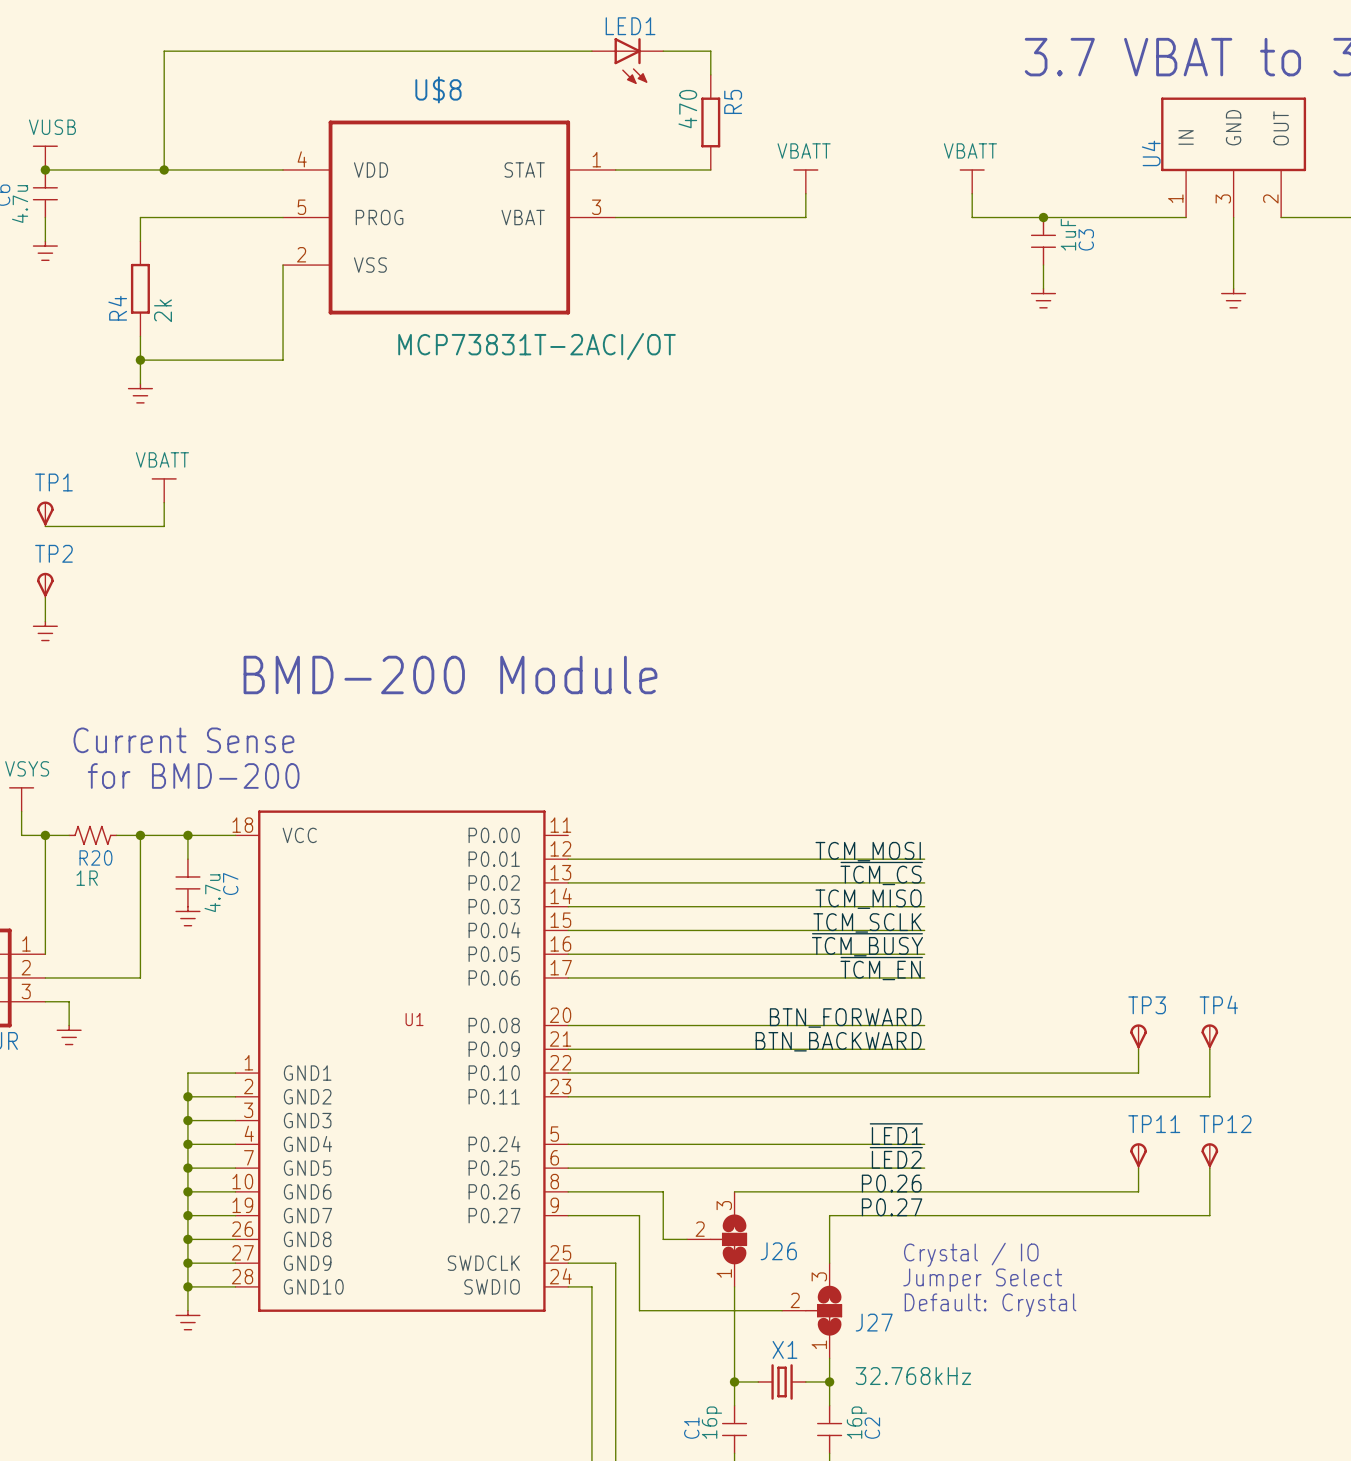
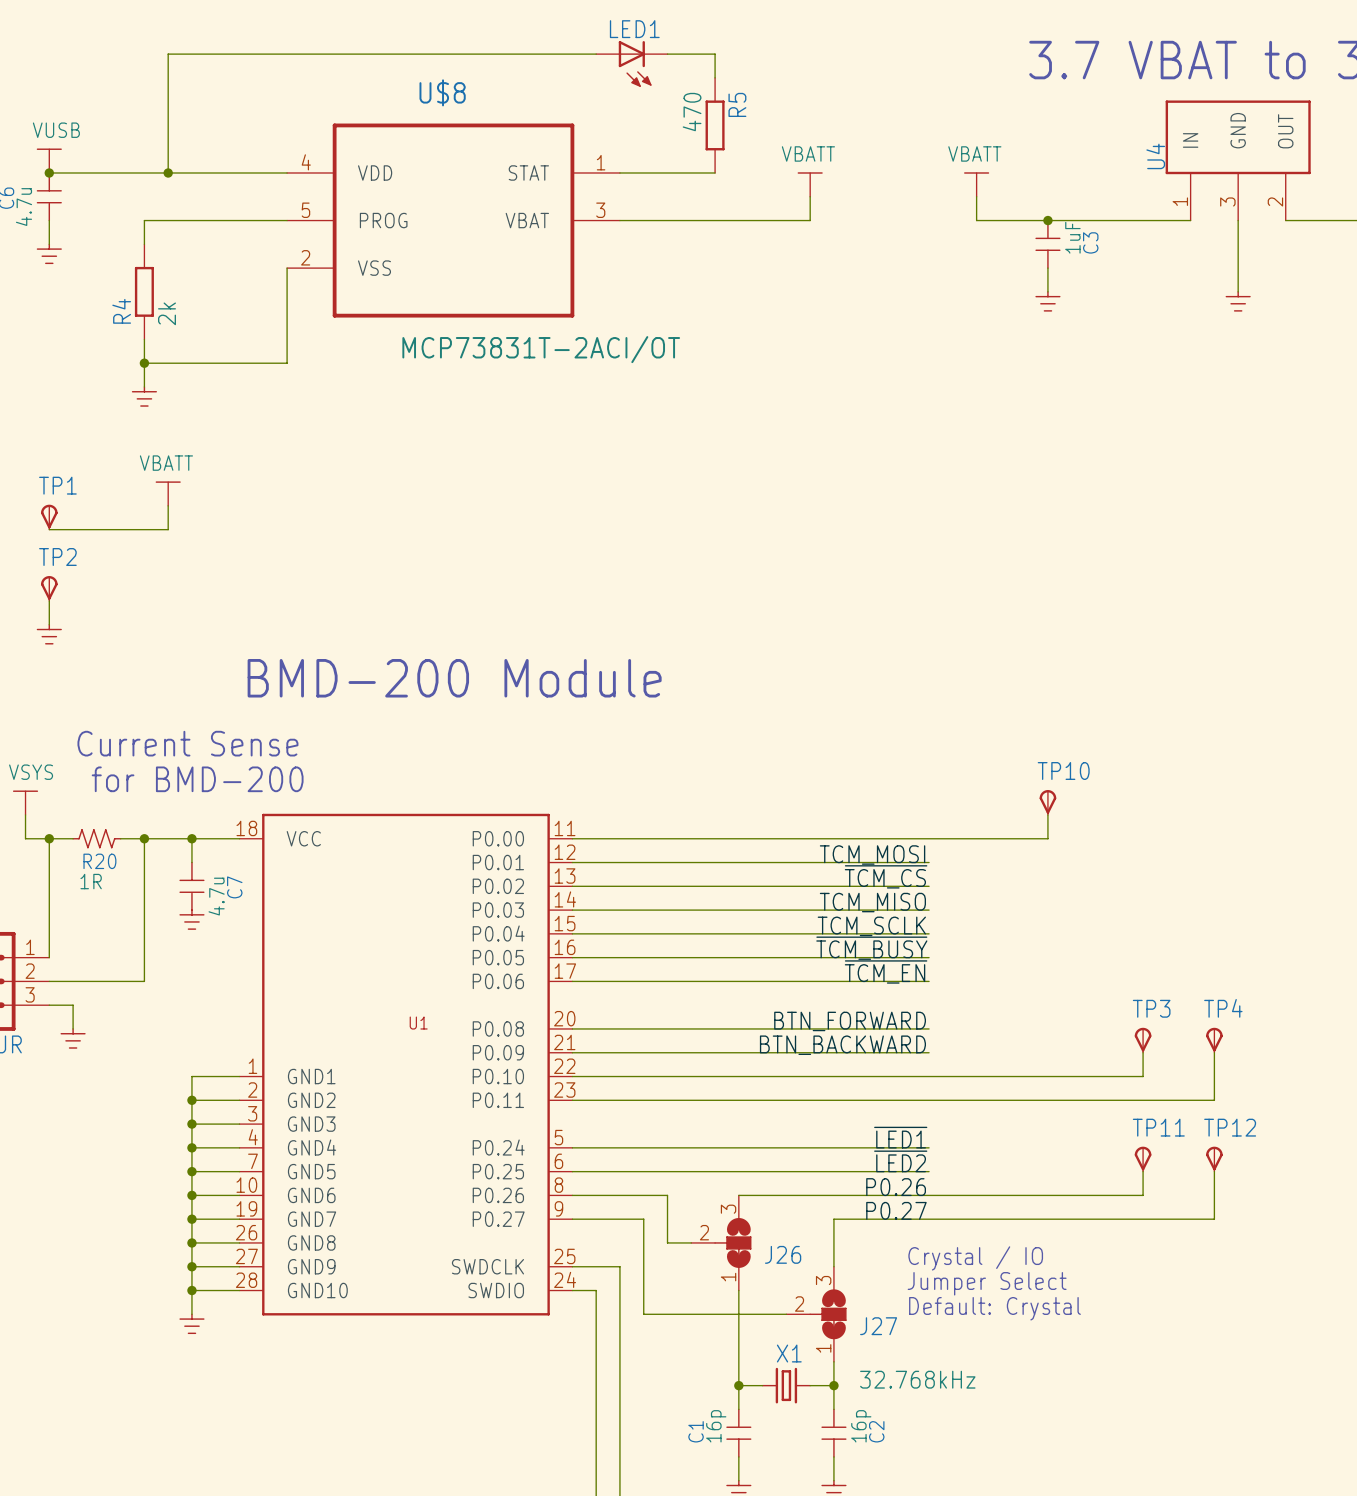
TP10: none -> (1047, 802)
wire: none -> (1047, 814) (1047, 838) (572, 838)

